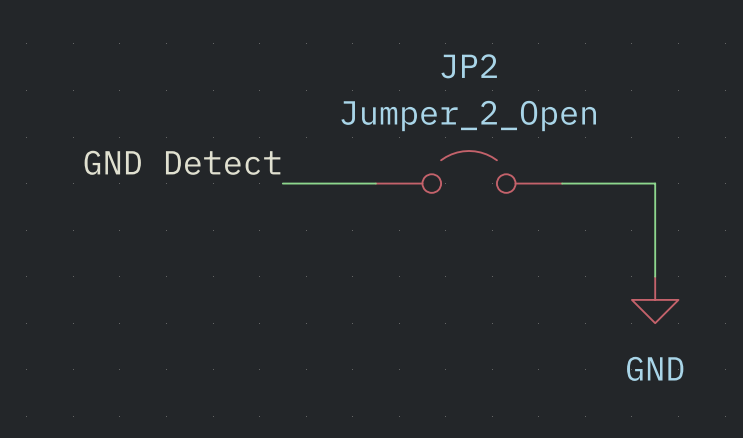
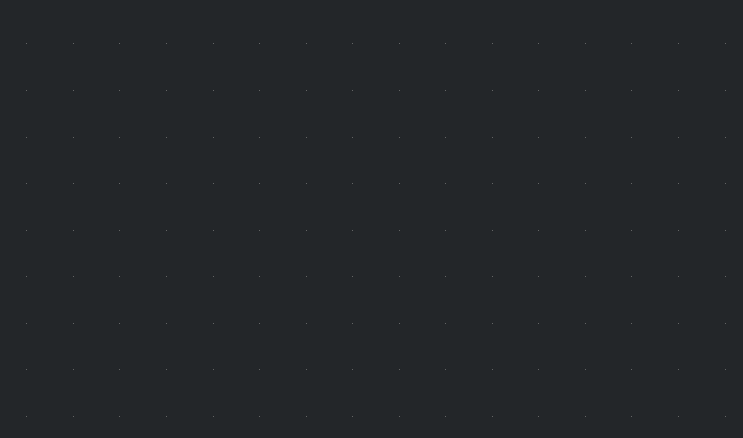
label: GND Detect (182, 162) -> none
JP2: Jumper_2_Open (469, 171) -> none
wire: (282, 183) (375, 183) -> none
wire: (562, 183) (655, 183) (655, 276) -> none
power symbol: GND (655, 299) -> none

